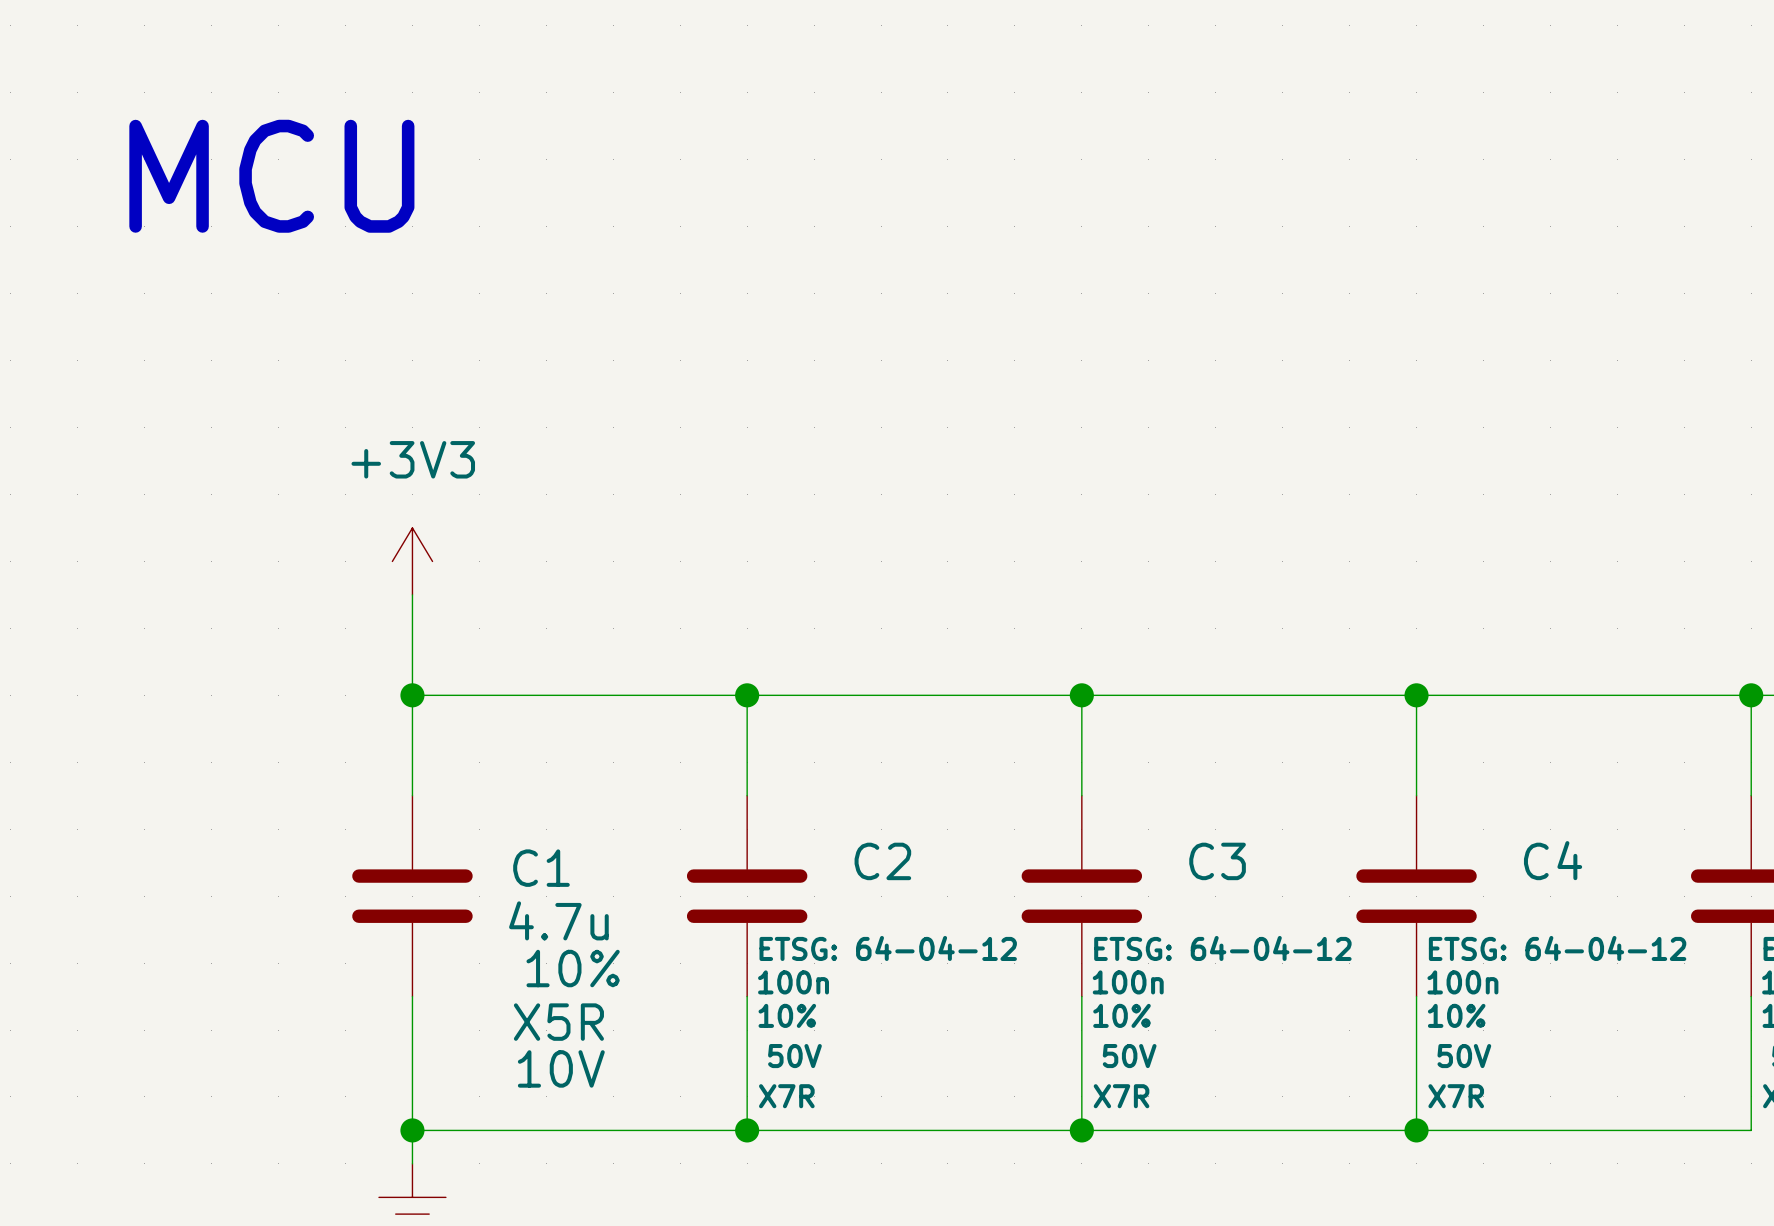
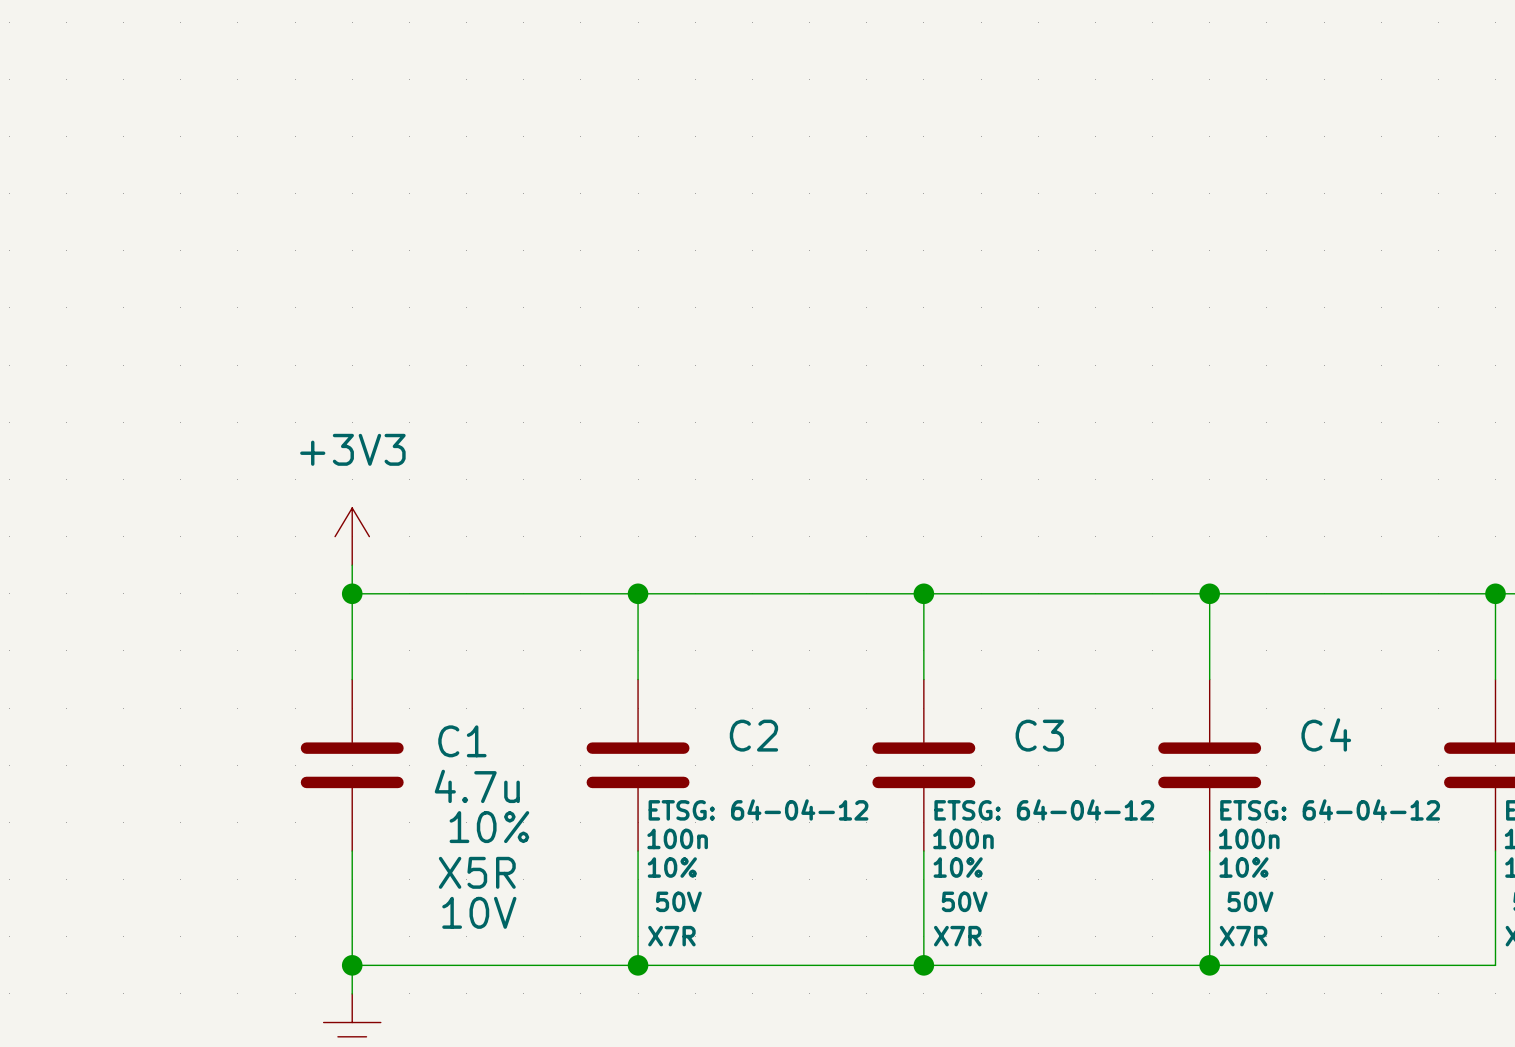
text: MCU (271, 176) -> none
power symbol position: +3V3 (412, 561) -> +3V3 (352, 536)

